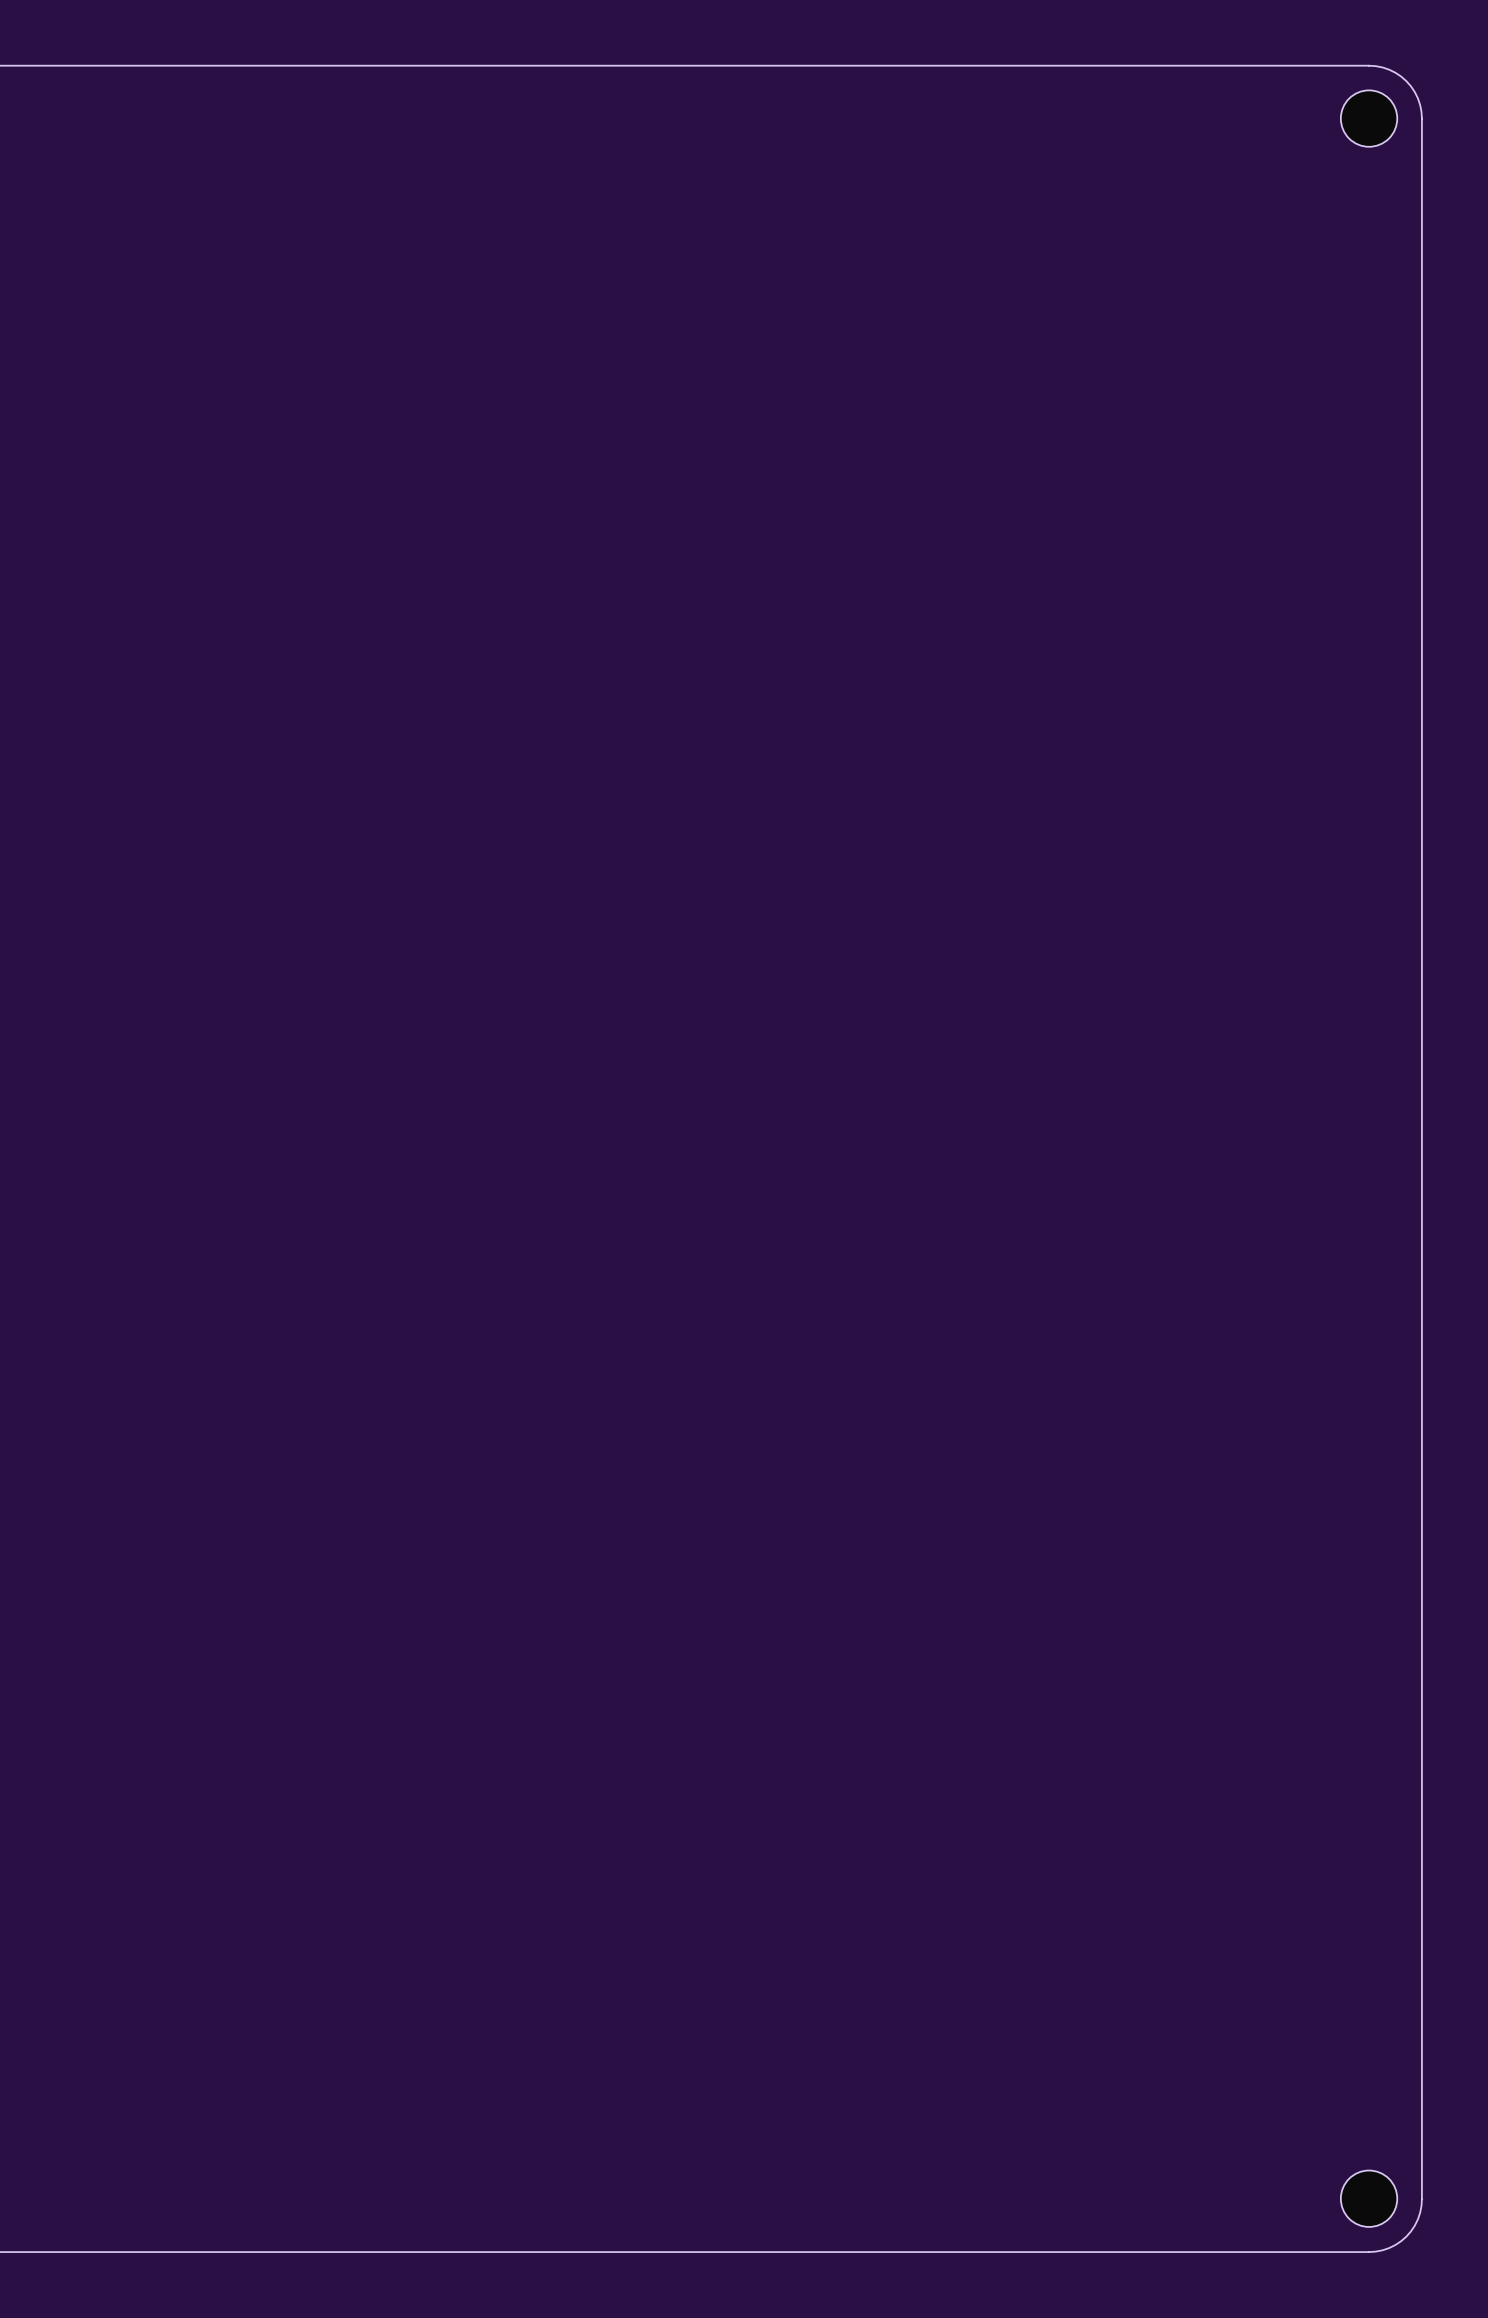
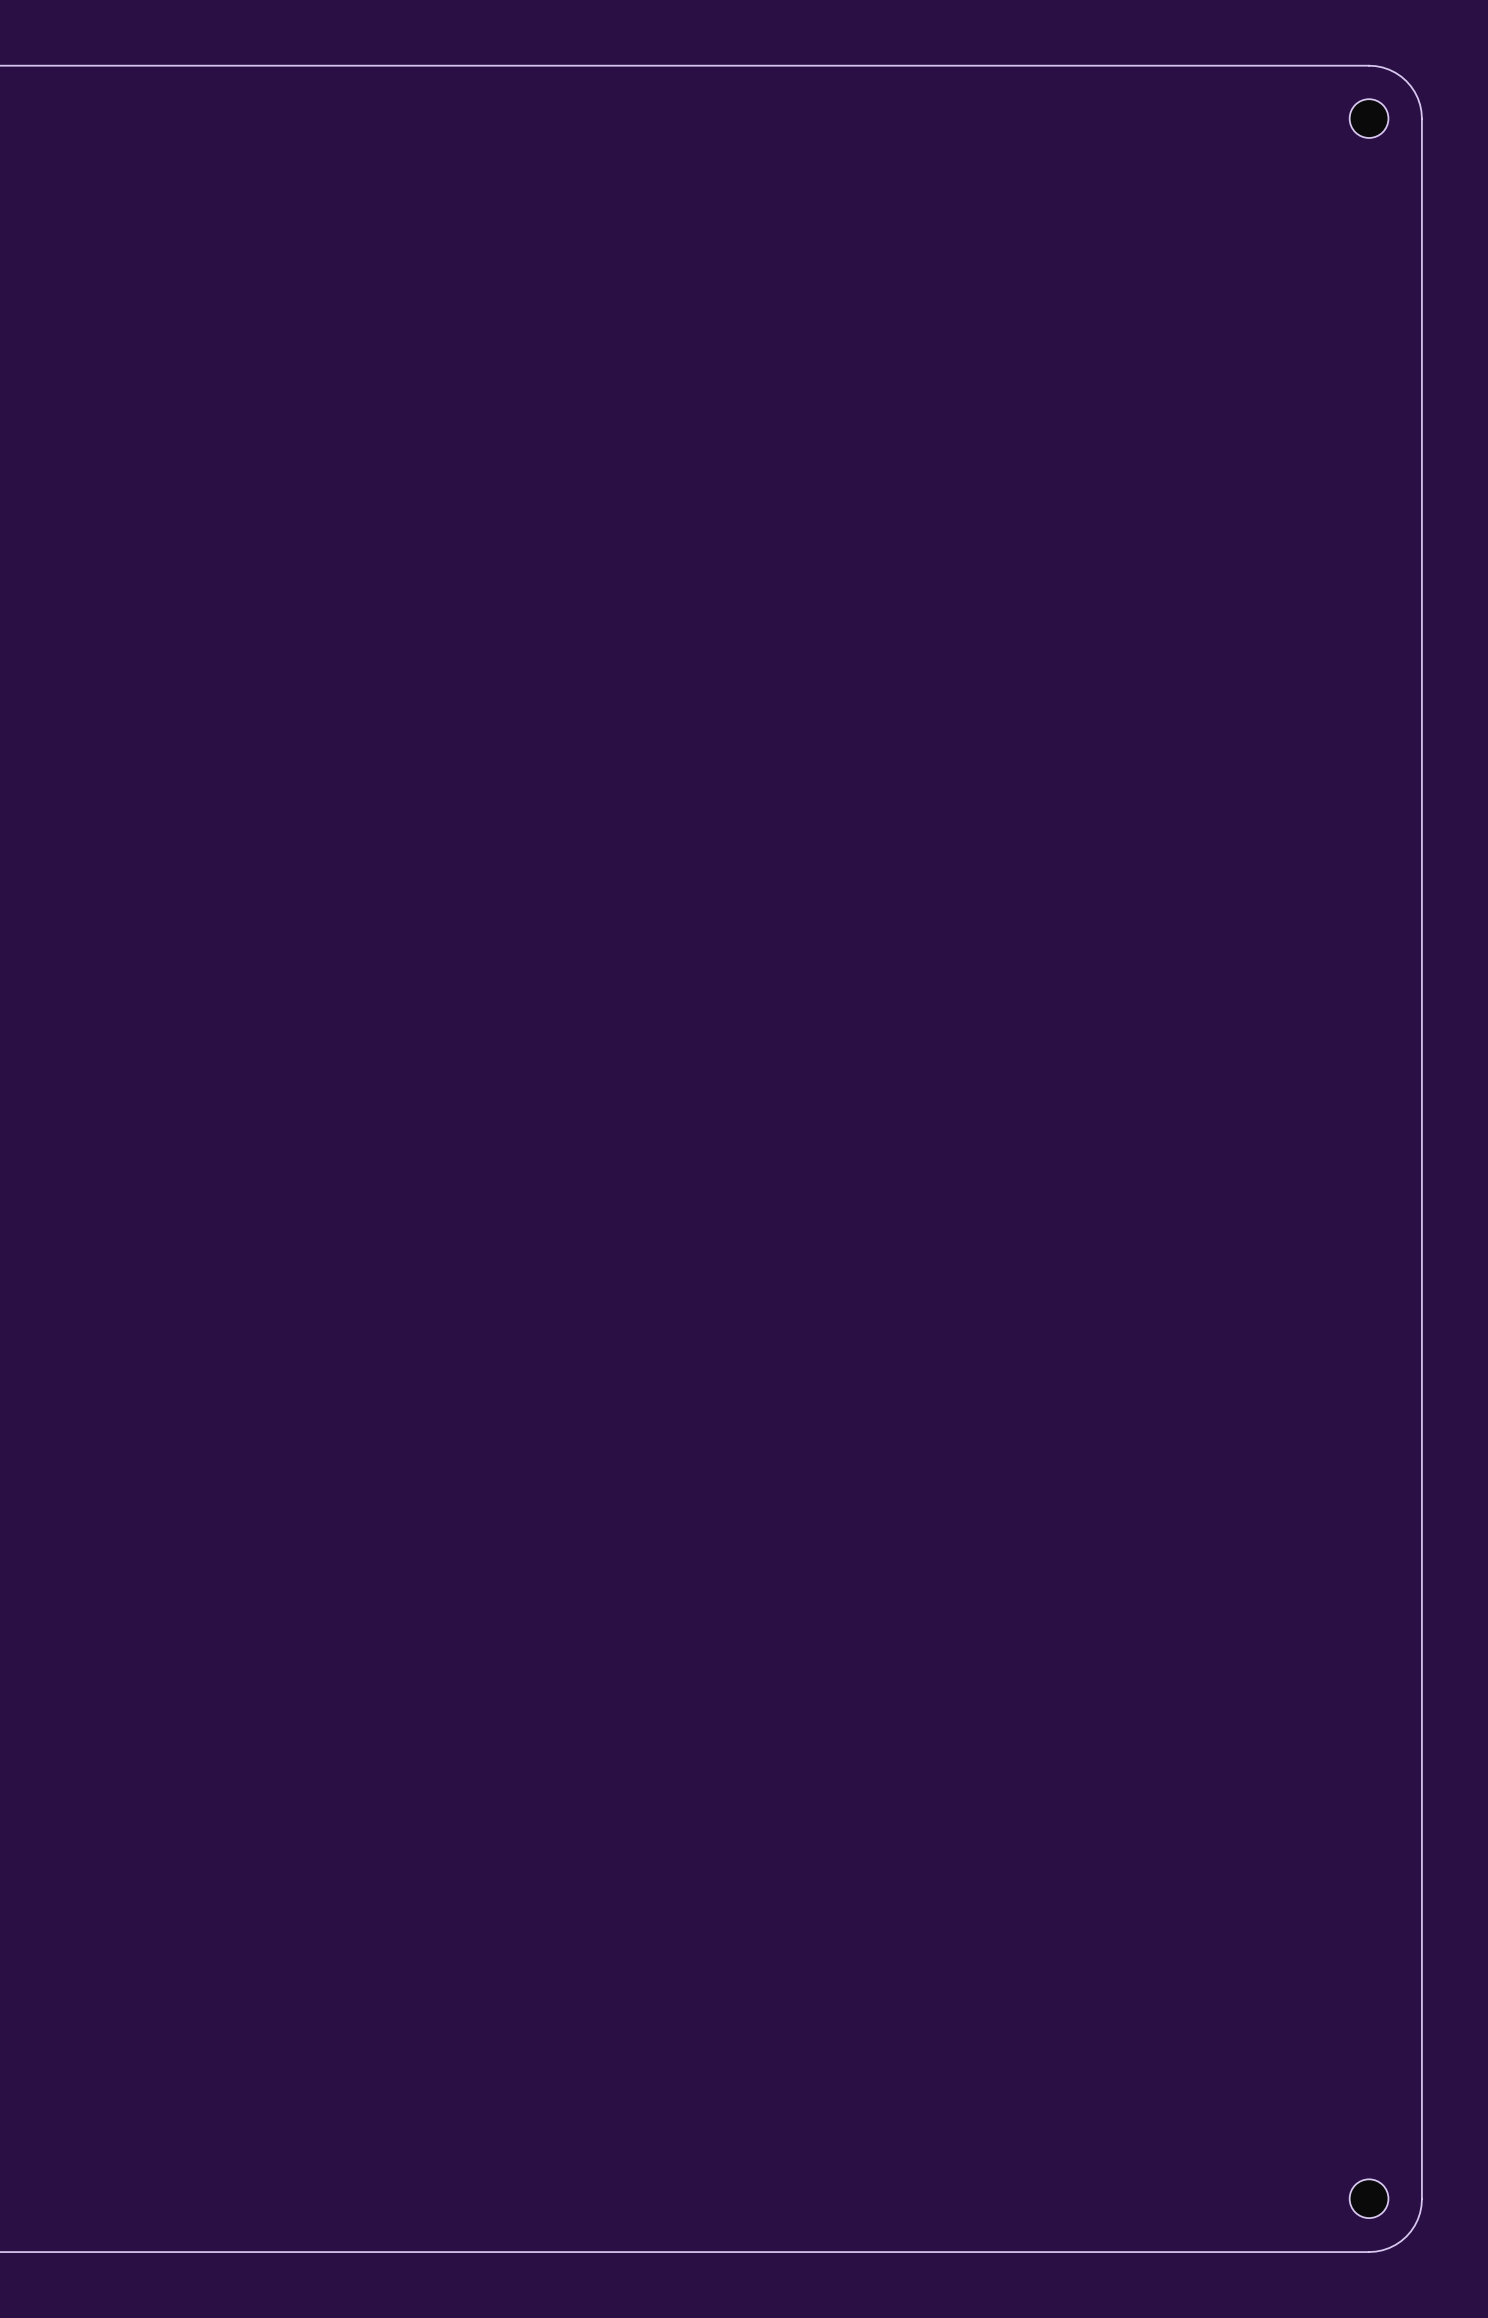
part footprint: [1340, 90, 1398, 147] -> [1349, 99, 1389, 138]
part footprint: [1340, 2170, 1398, 2227] -> [1349, 2179, 1389, 2219]

